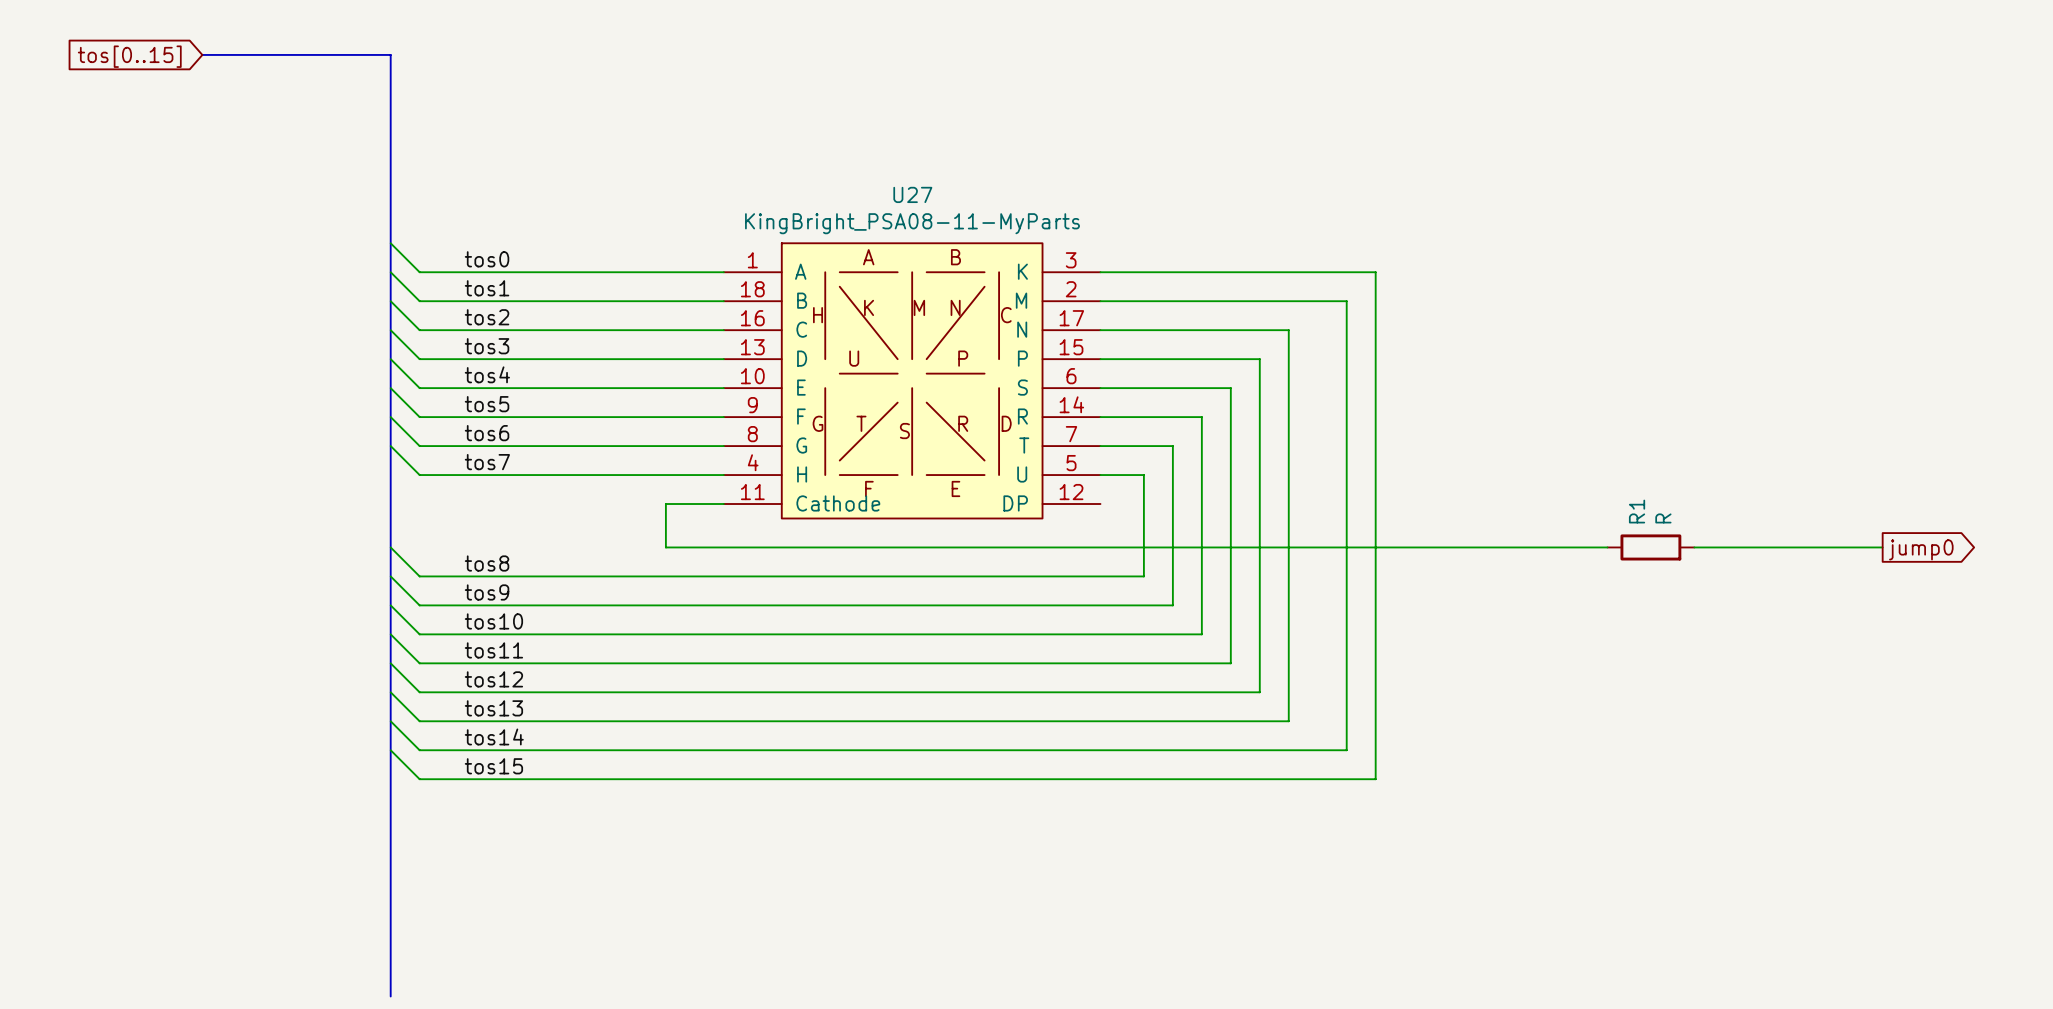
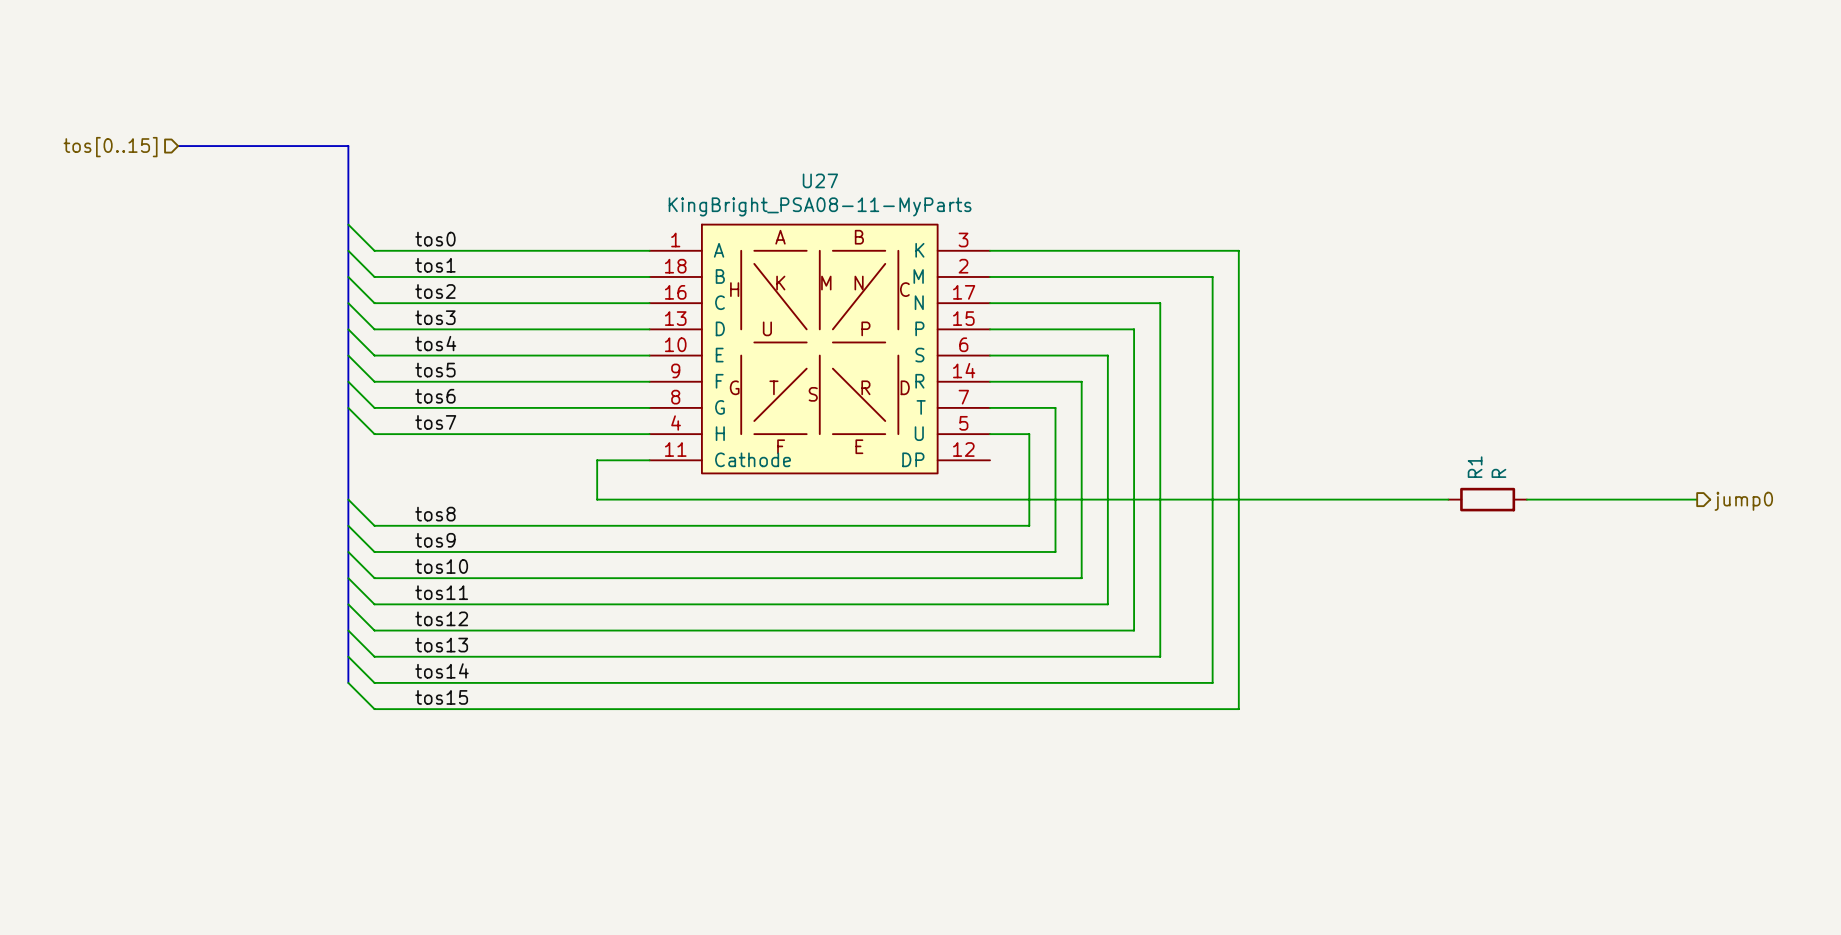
bus: (202, 54) (390, 54) (390, 156) -> (178, 146) (348, 146)
global label: tos[0..15] (129, 56) -> none
hierarchical label: none -> tos[0..15] (110, 147)
global label: jump0 (1921, 549) -> none
hierarchical label: none -> jump0 (1743, 501)
bus: (390, 750) (390, 996) -> none

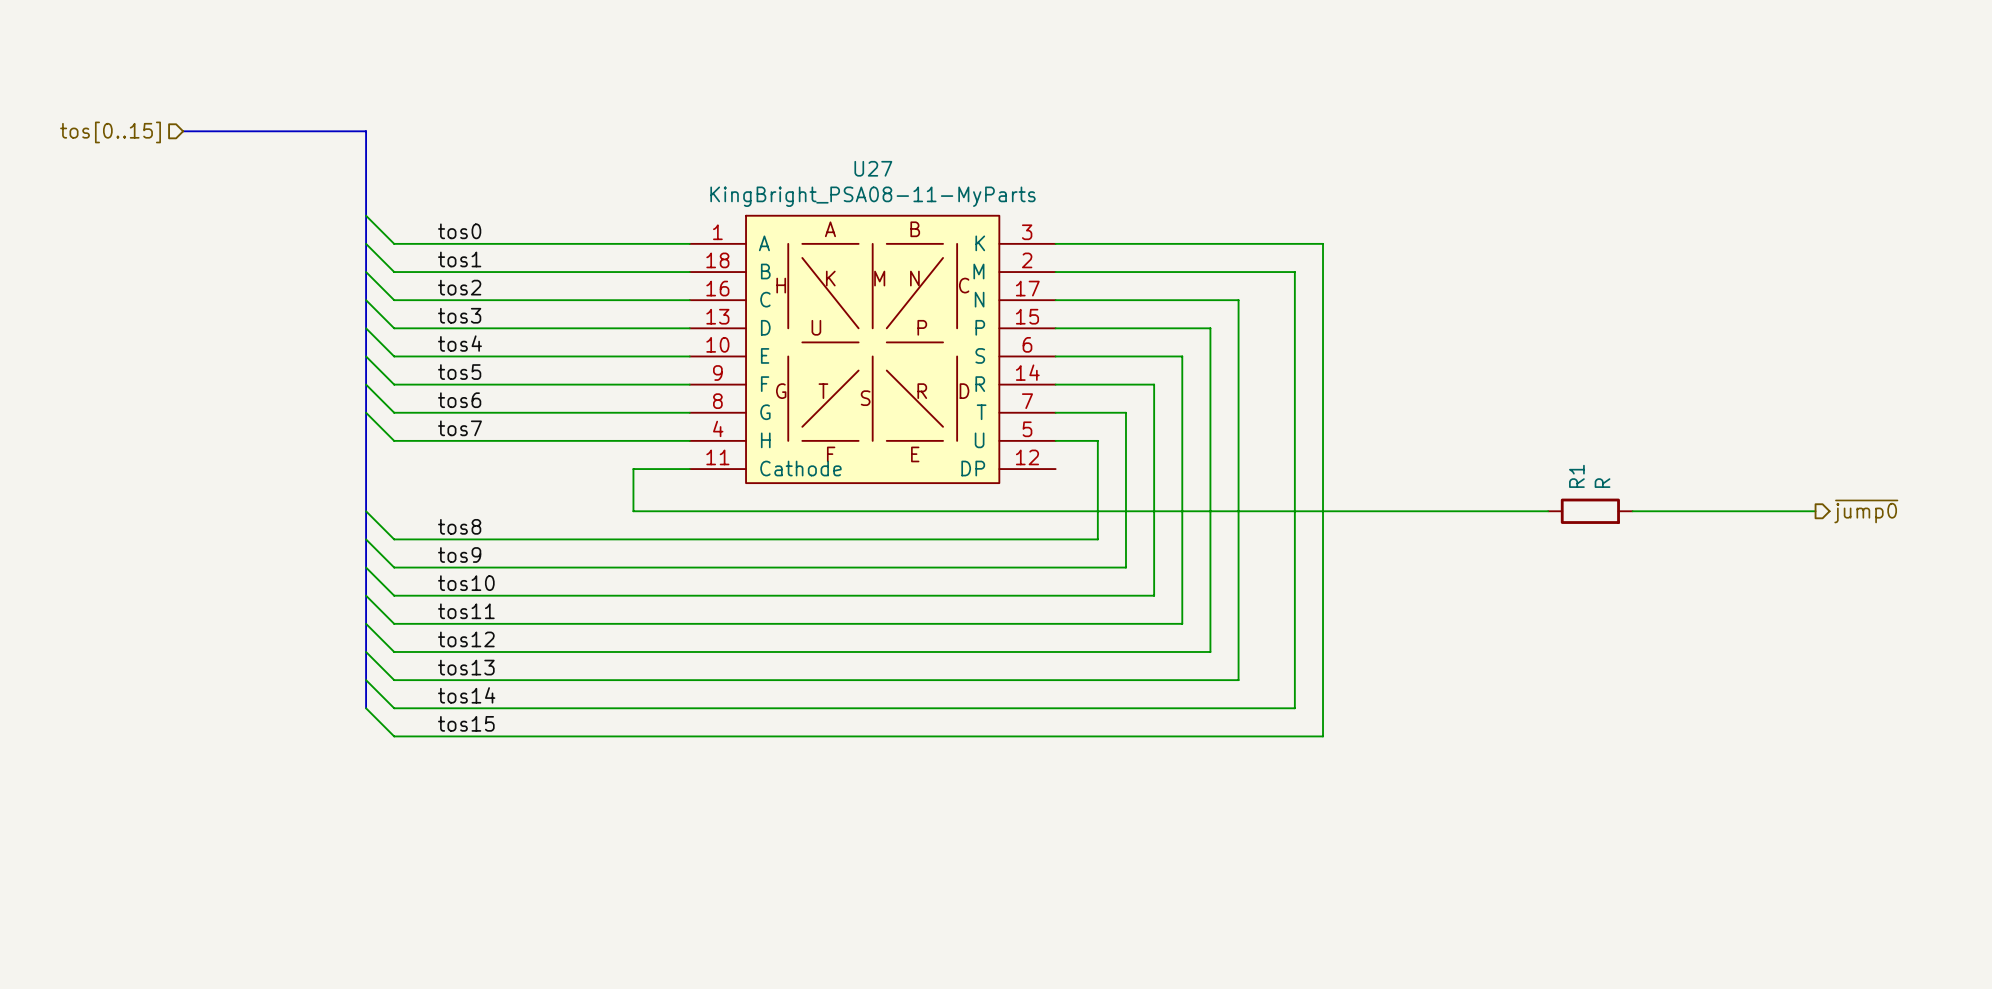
hierarchical label: jump0 (1743, 501) -> ~{jump0} (1866, 511)

